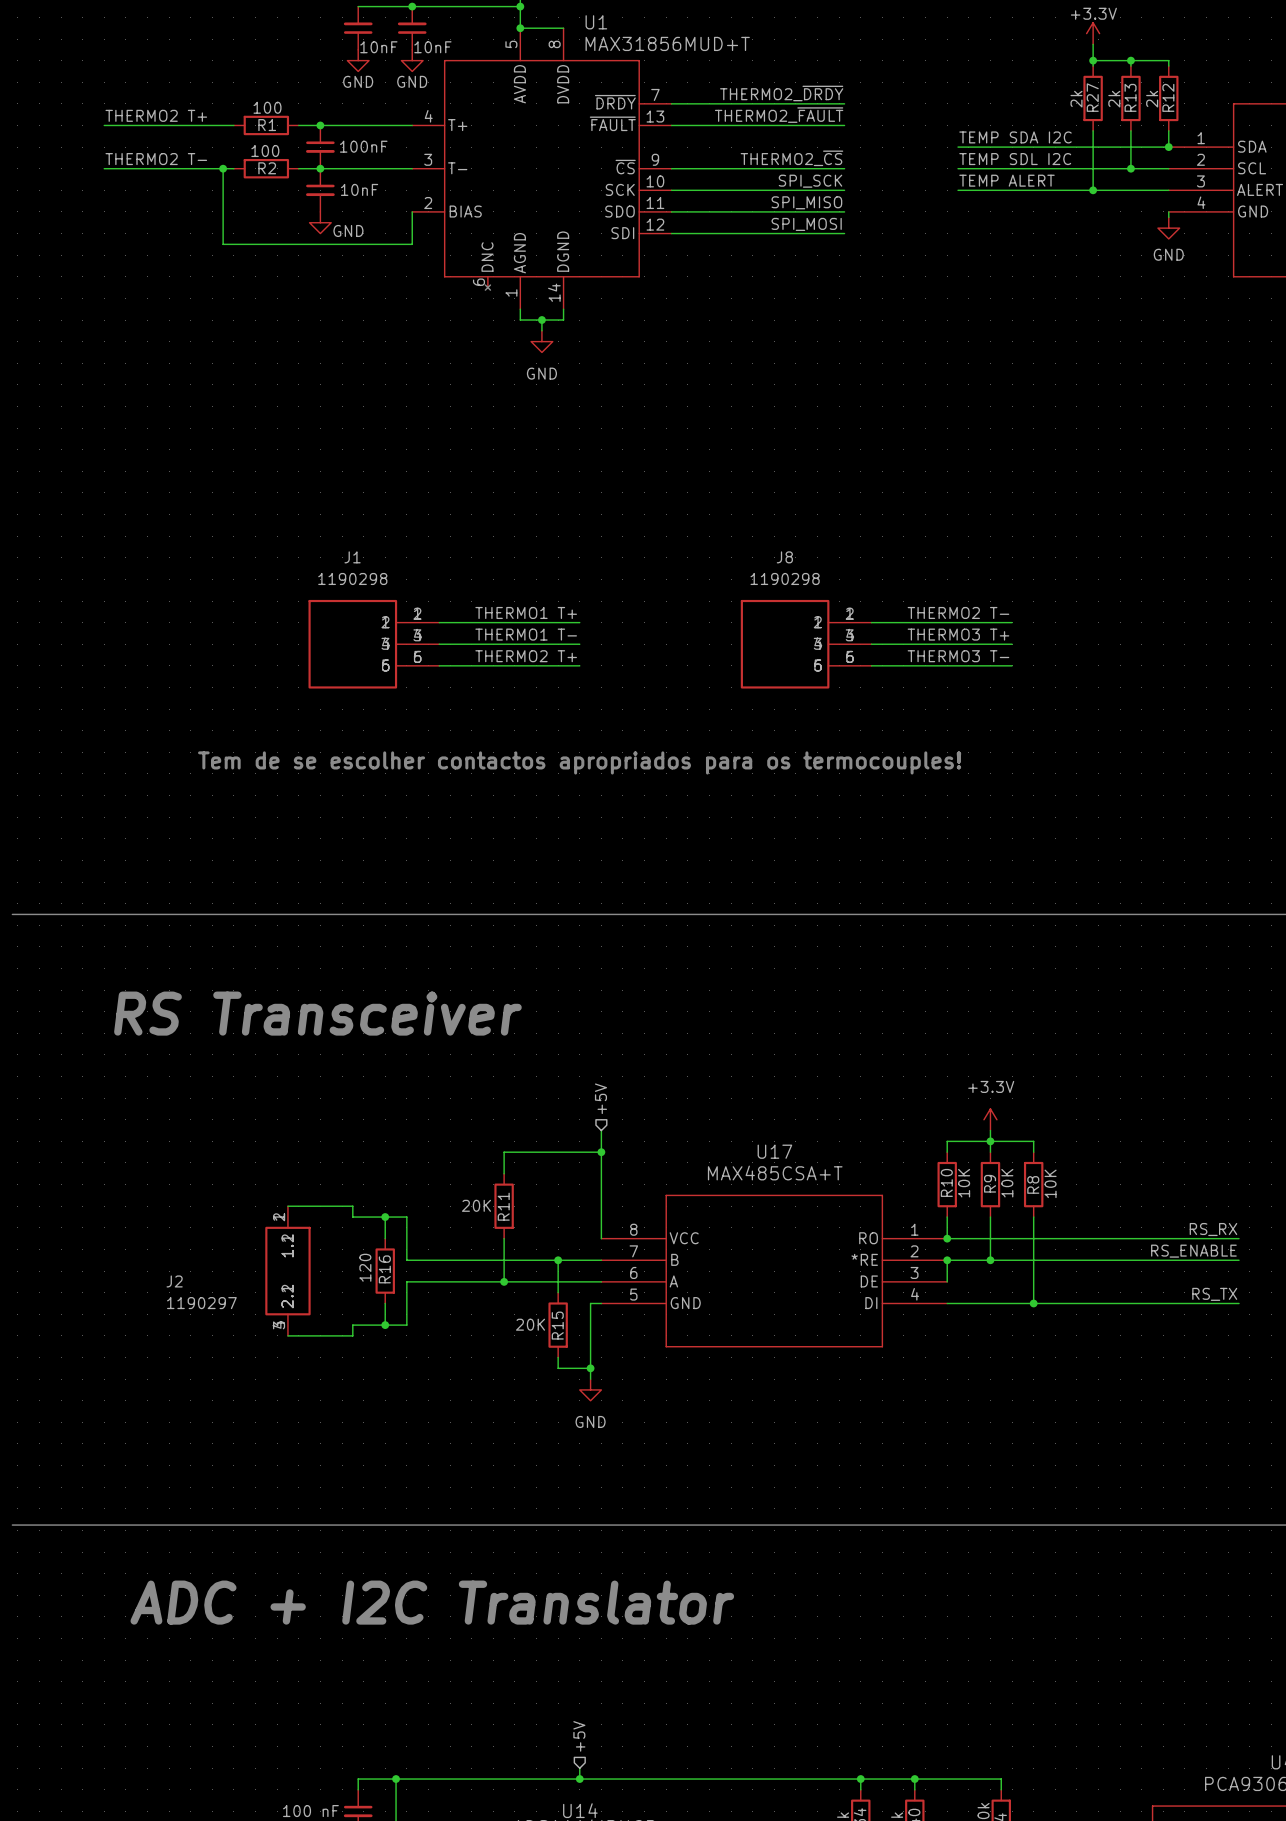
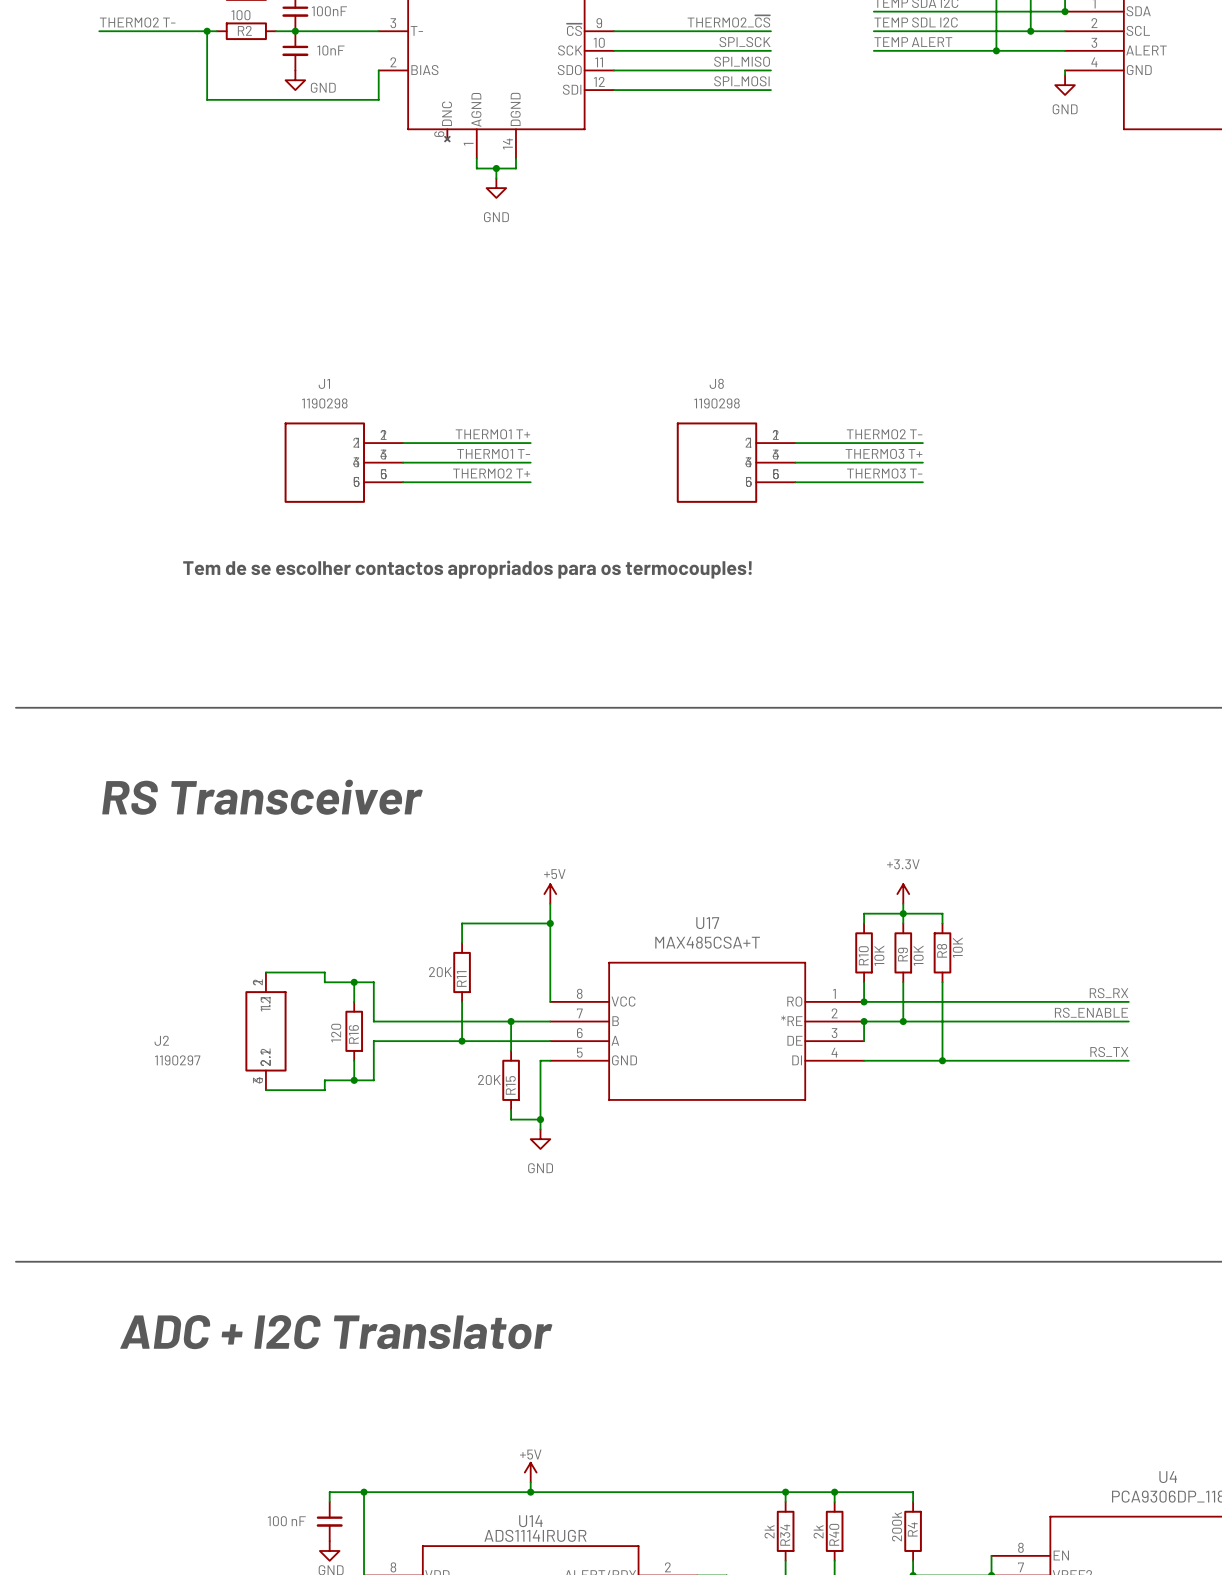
hierarchical label: +5V (600, 1098) -> none
power symbol: none -> +5V (550, 894)
hierarchical label: +5V (579, 1736) -> none
power symbol: none -> +5V (530, 1472)

